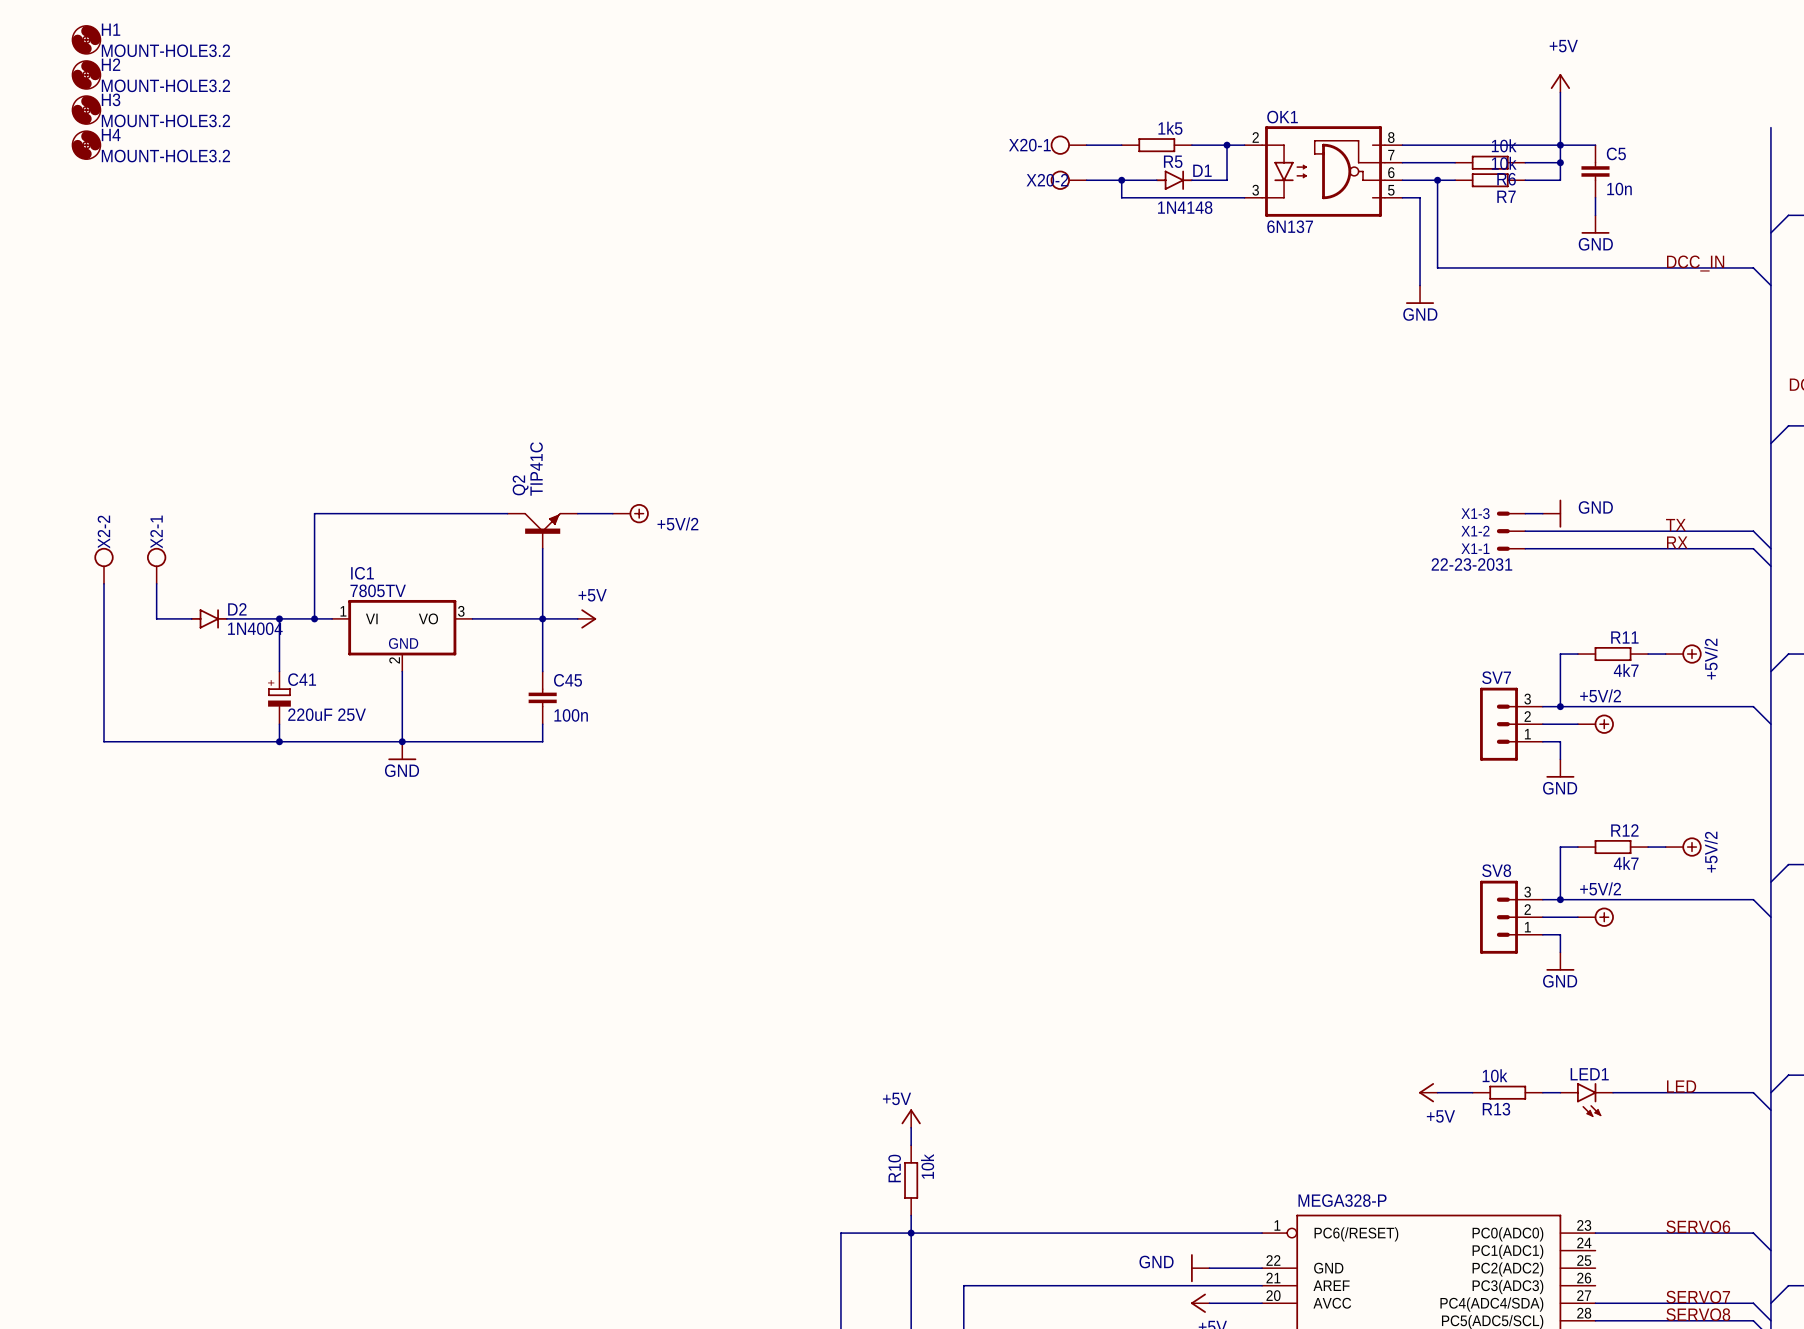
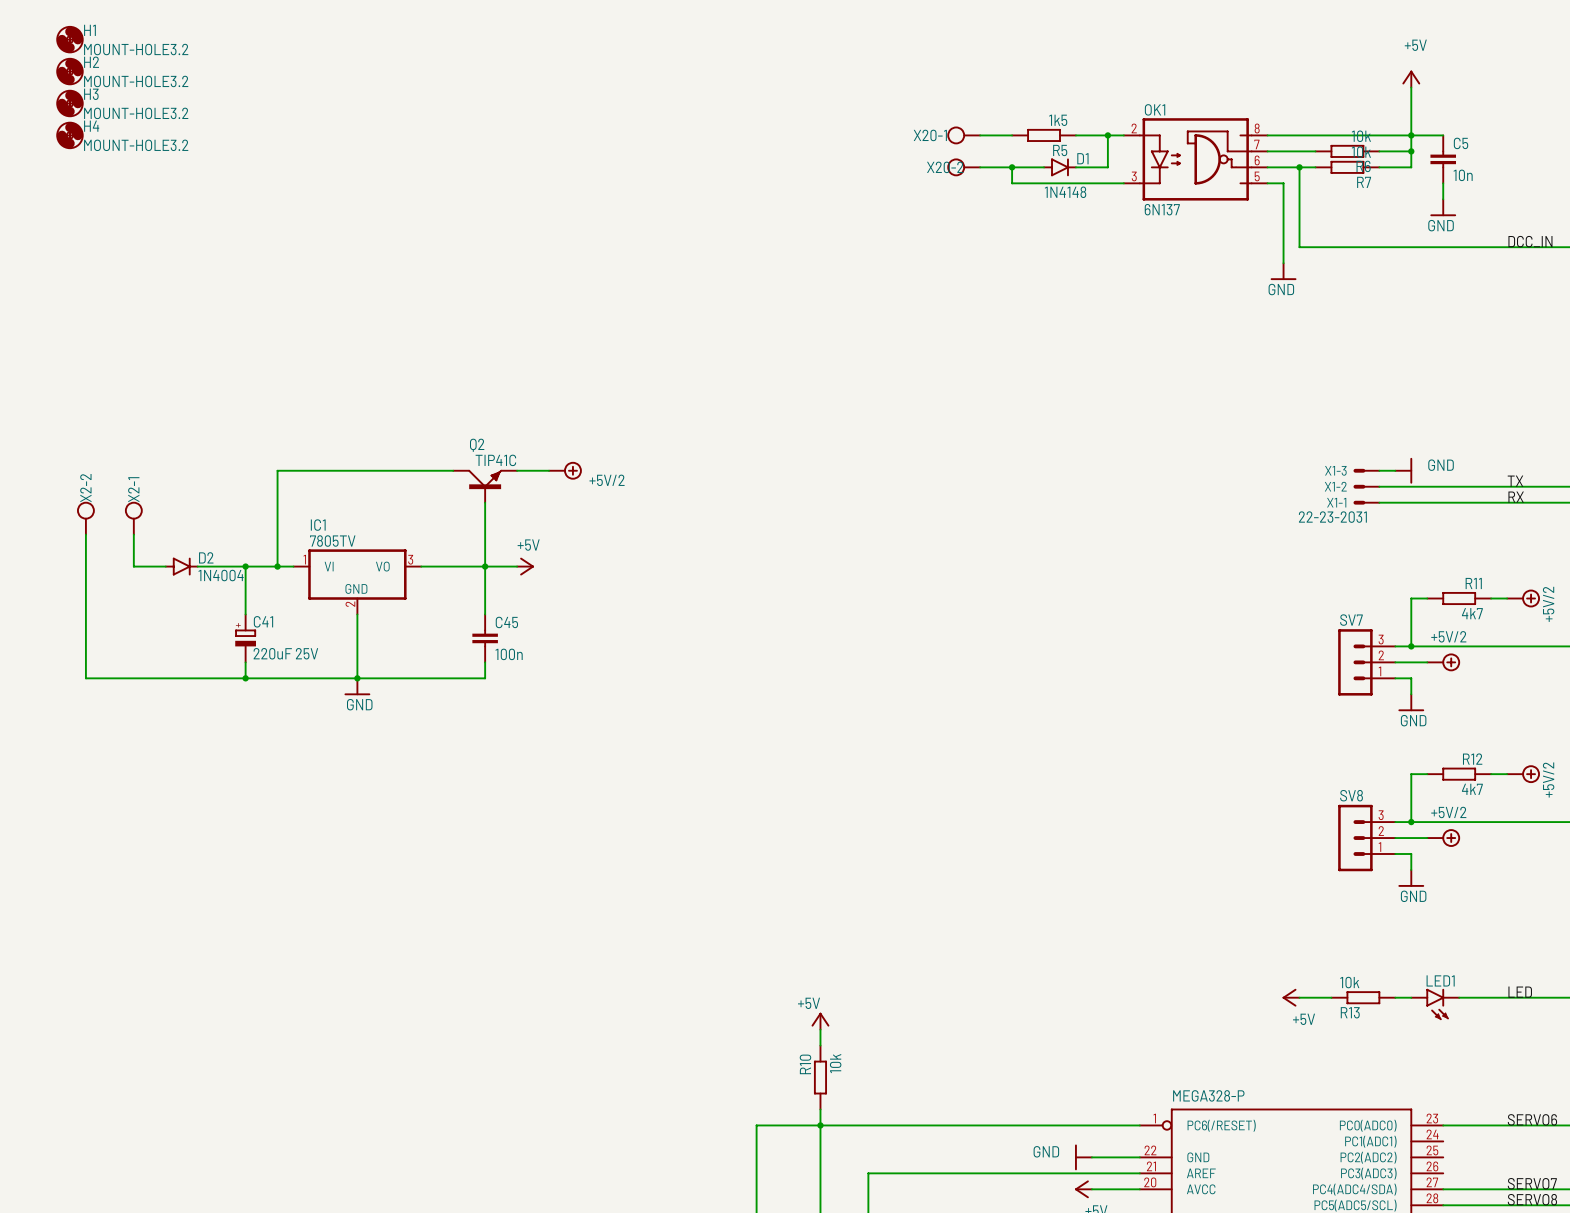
Q2 value rotation: 0° (536, 468) -> 90° clockwise (495, 460)
Q2 name rotation: 0° (520, 485) -> 90° clockwise (477, 445)

